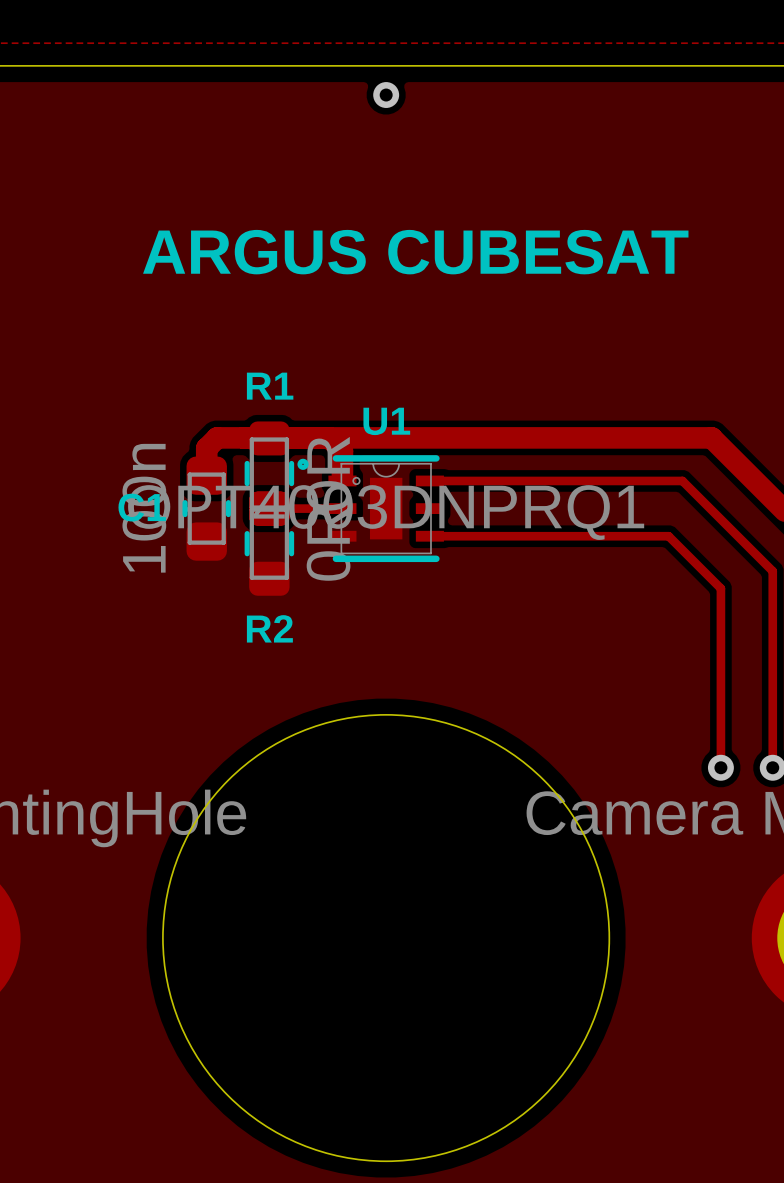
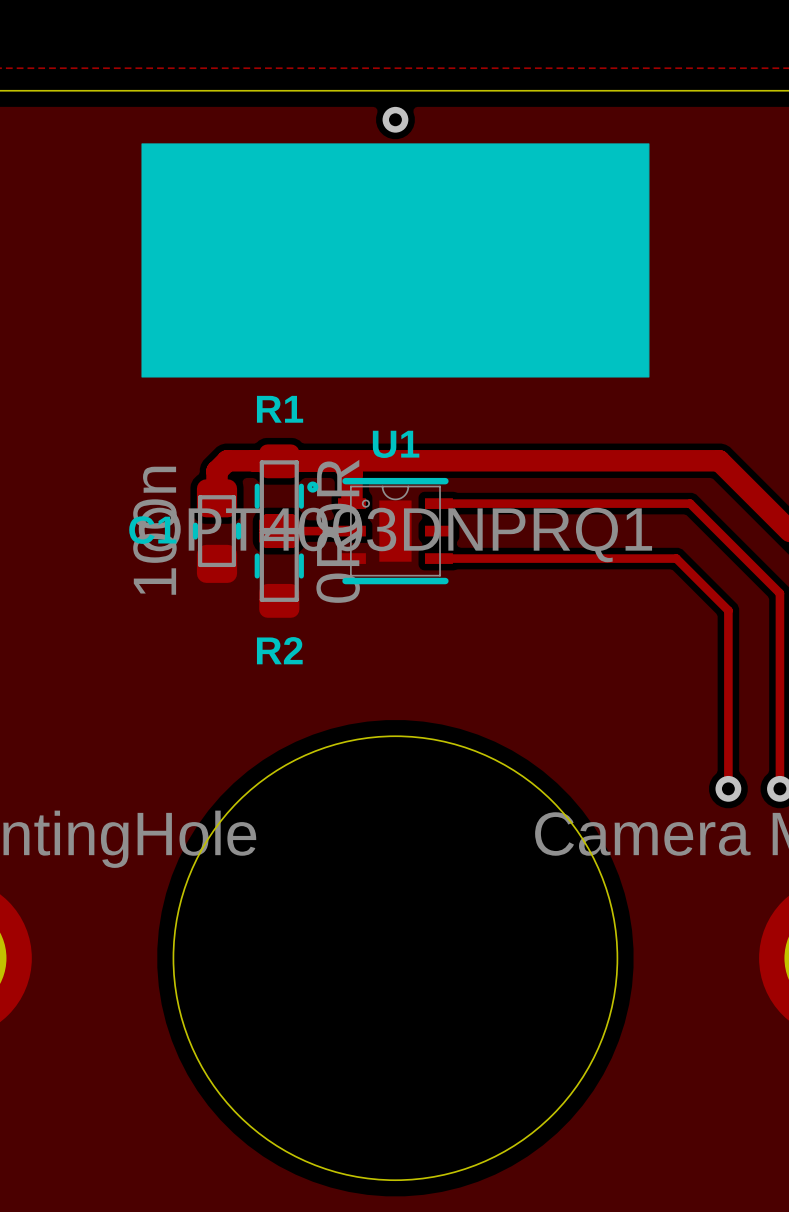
drawing: none -> [141, 143, 650, 378]
text: ARGUS CUBESAT (415, 252) -> none

